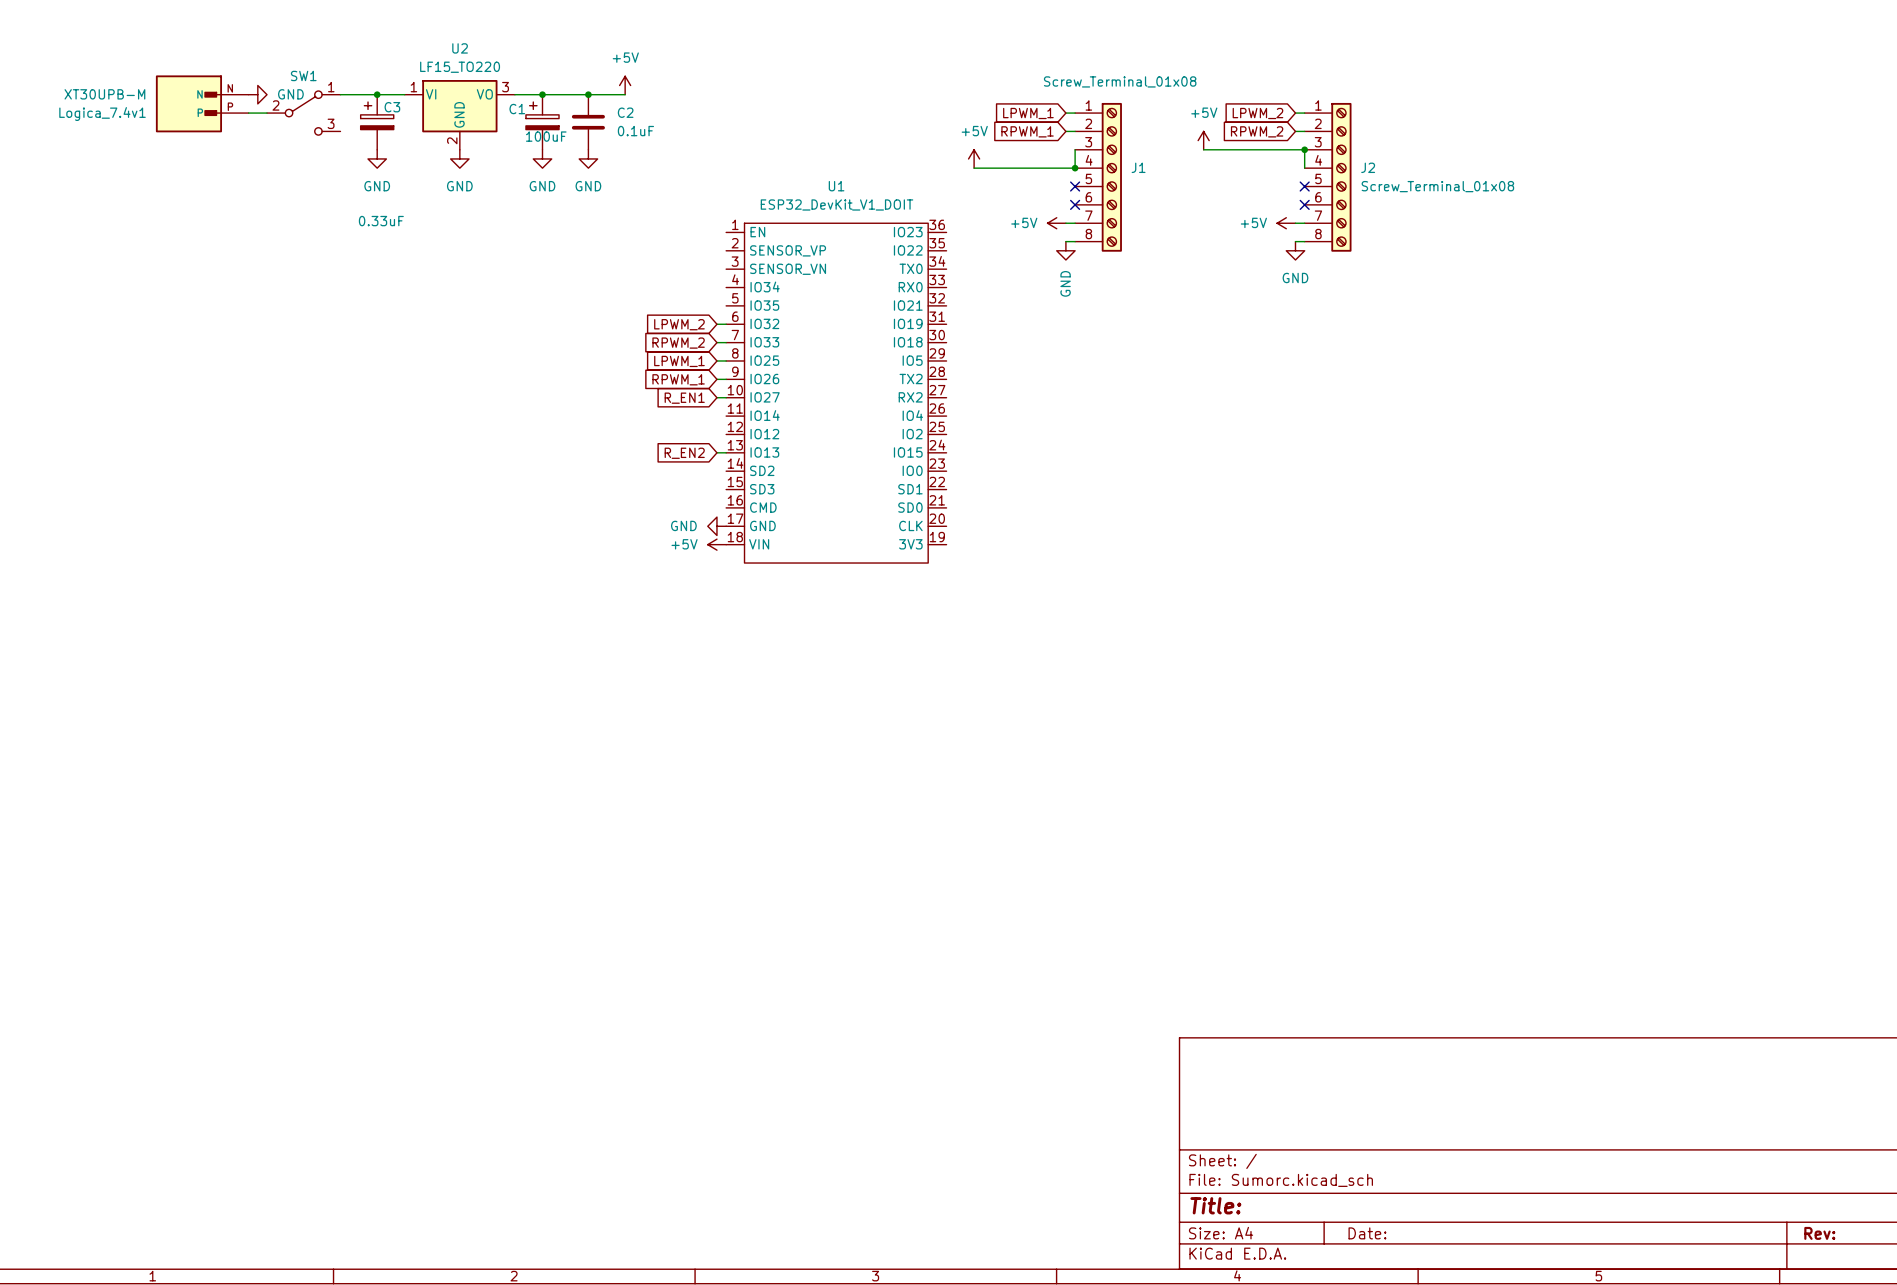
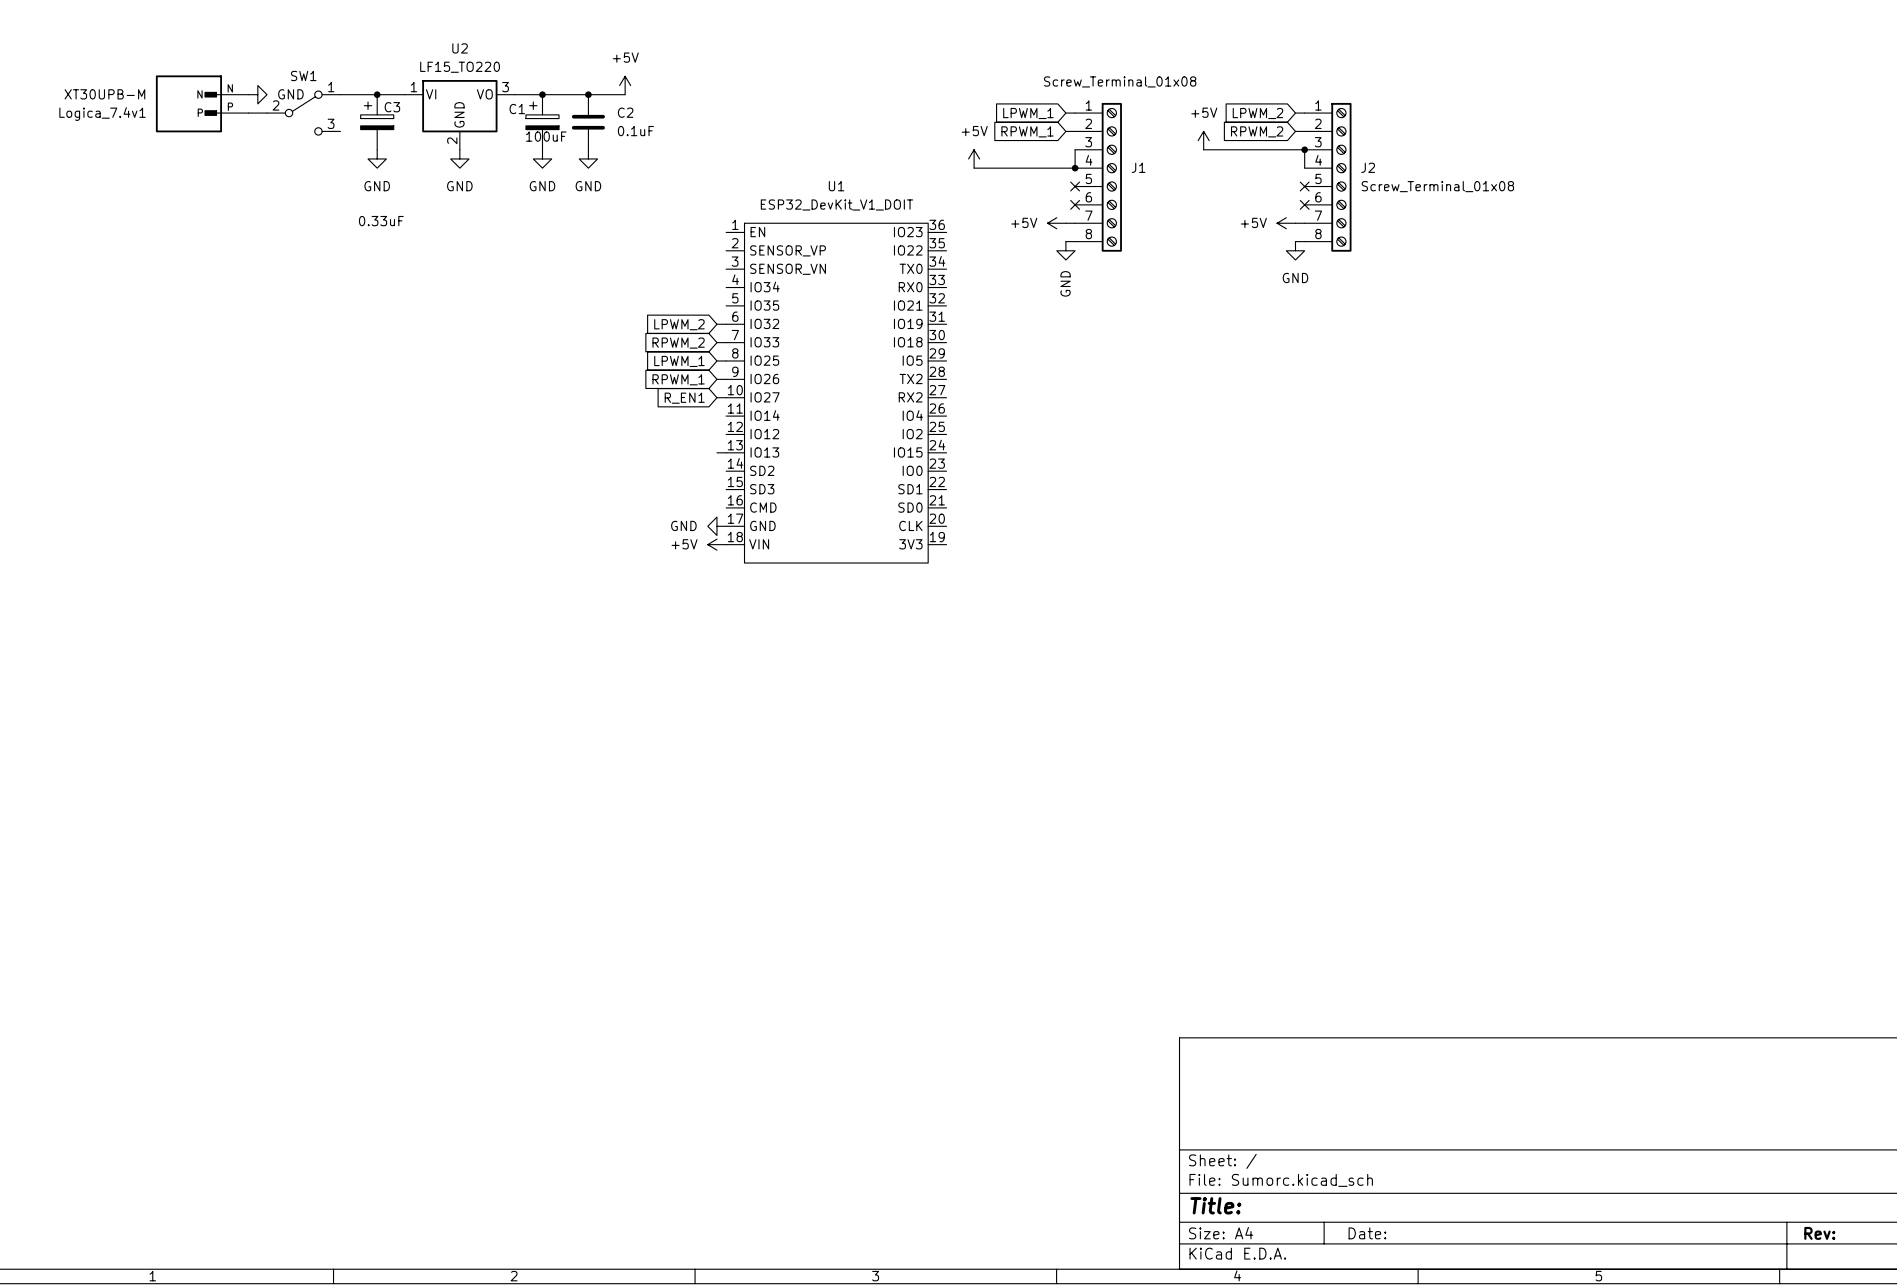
global label: R_EN2 (684, 453) -> none

